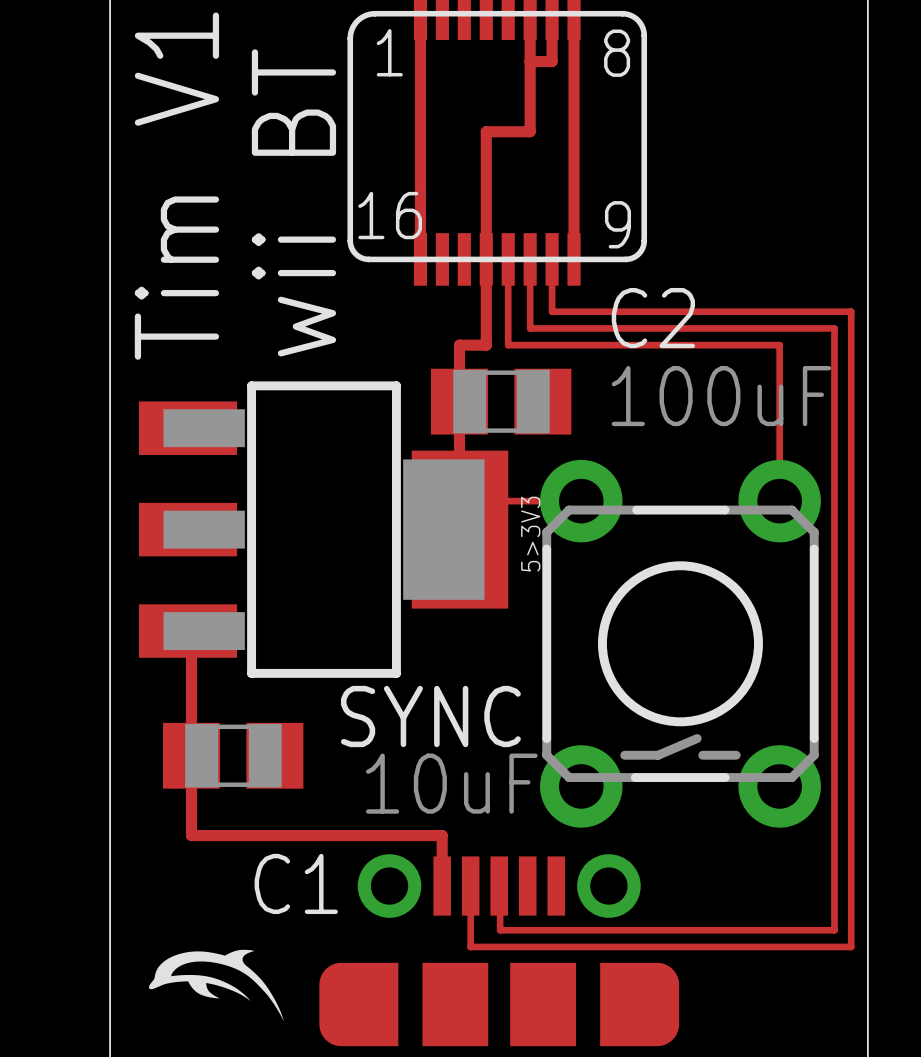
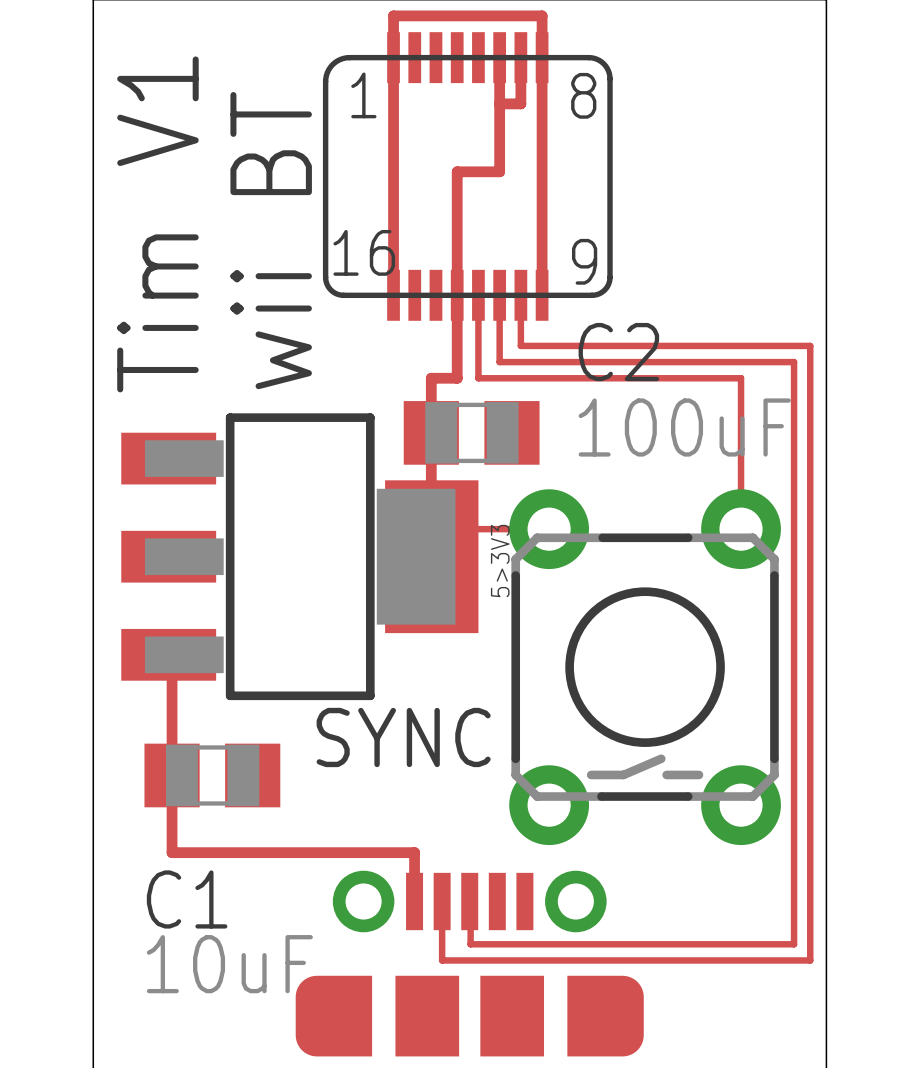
C1 value position: 10uF (451, 783) -> 10uF (229, 964)
C1 name position: C1 (296, 883) -> C1 (187, 899)
drawing: [149, 949, 284, 1021] -> none

